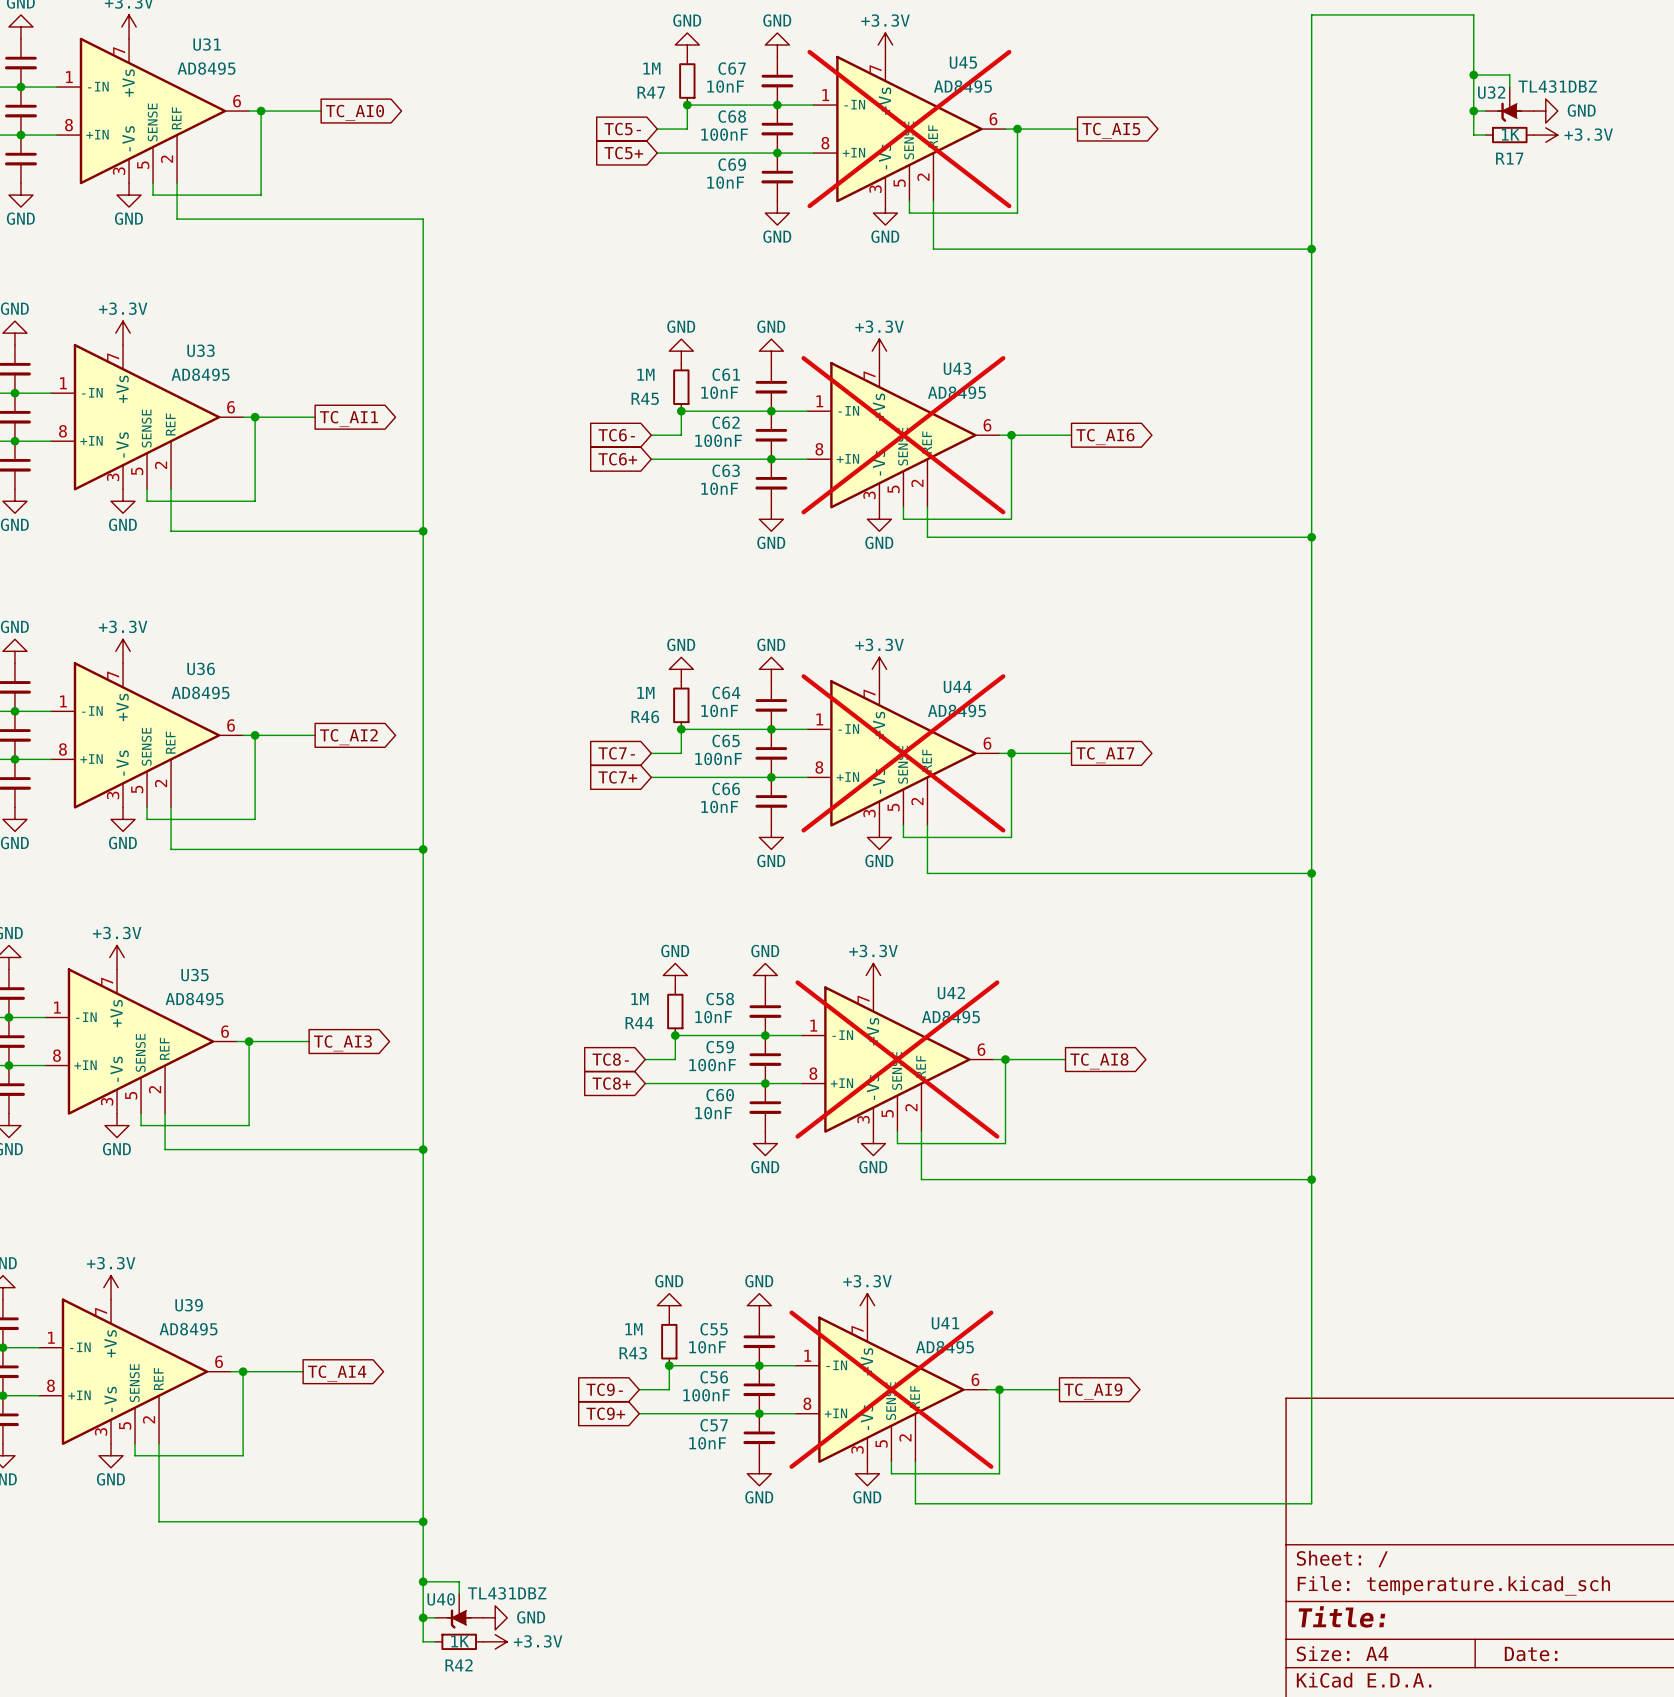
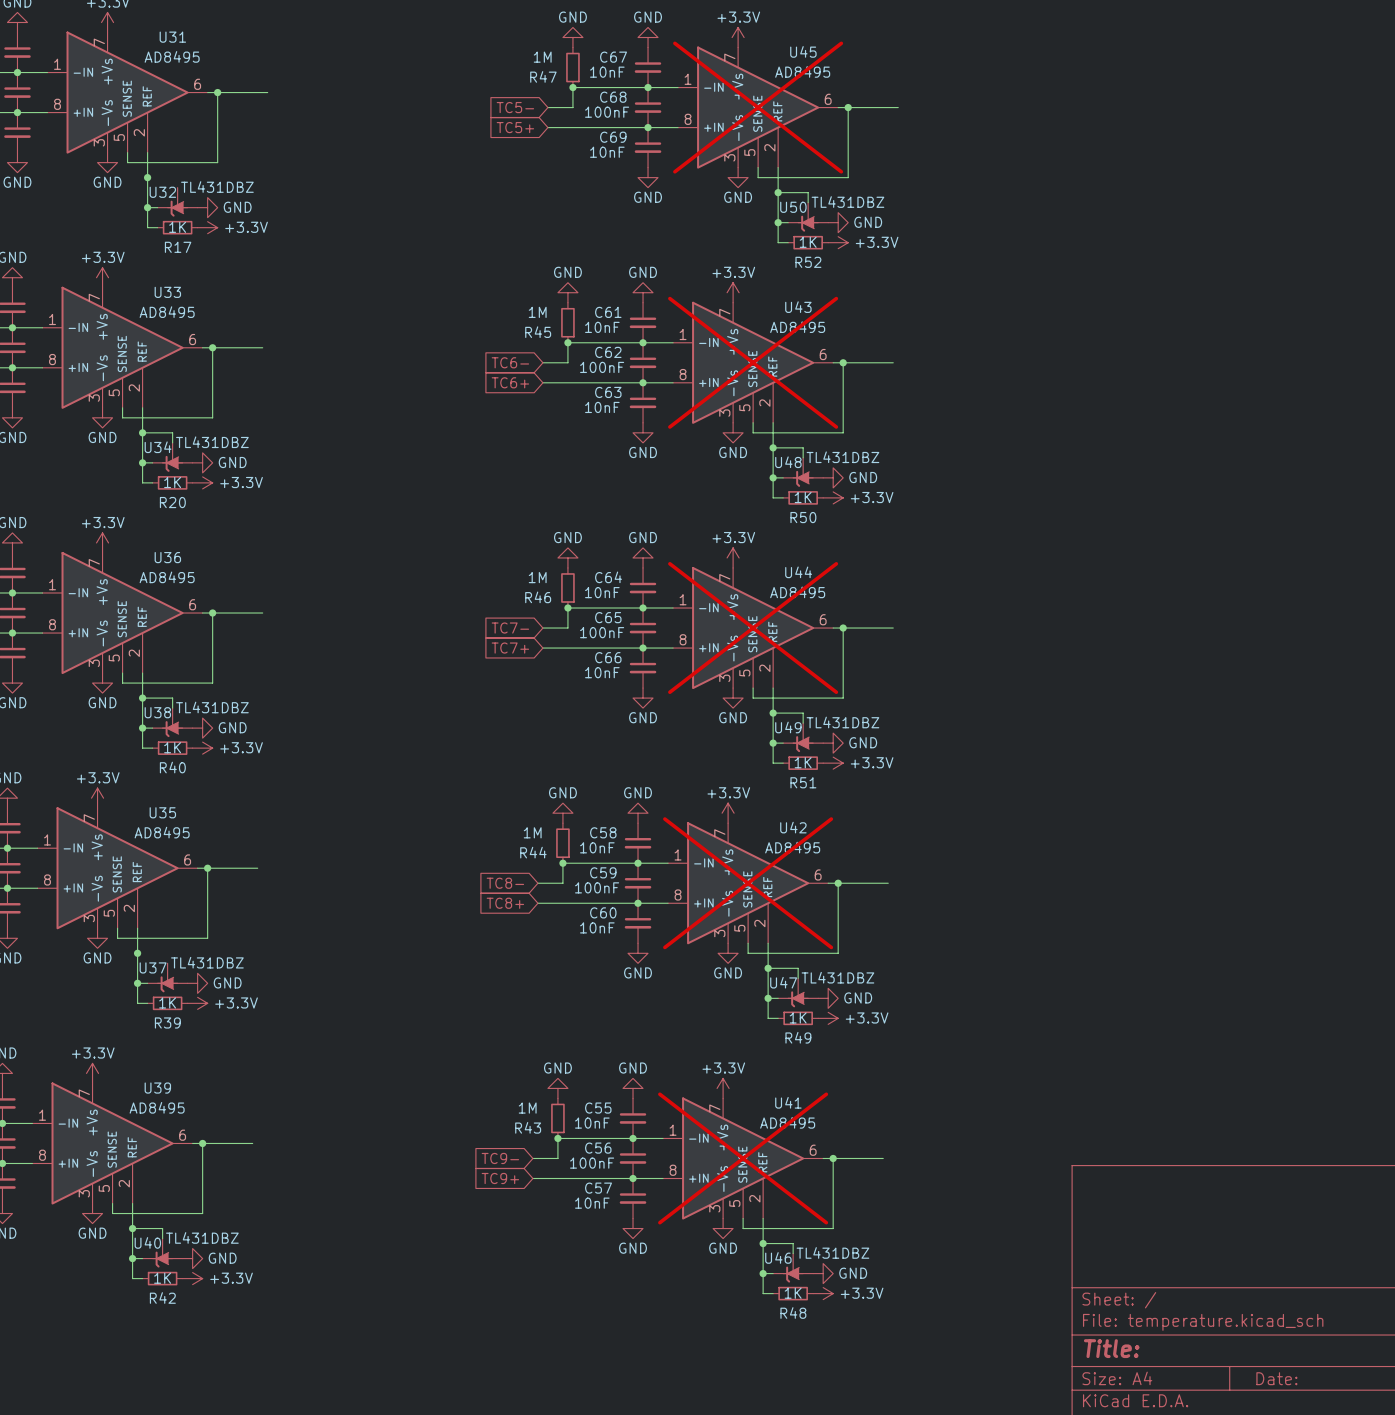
wire: (1473, 75) (1509, 75) (1509, 87) -> none
junction: (1473, 75) -> none
U32 position: (1509, 104) -> (177, 202)
wire: (1473, 111) (1485, 111) -> none
junction: (1473, 111) -> none
power symbol: GND (1545, 111) -> none
global label: TC_AI0 (355, 112) -> none
global label: TC_AI5 (1111, 130) -> none
wire: (1485, 135) (1473, 135) (1473, 14) (1311, 14) (1311, 1503) (915, 1503) -> (773, 1293) (763, 1293) (763, 1253)
R17 position: (1509, 135) -> (177, 227)
power symbol: +3.3V (1545, 135) -> none
junction: none -> (147, 177)
wire: (177, 219) (423, 219) (423, 1641) (435, 1641) -> (147, 182) (147, 227) (157, 227)
wire: none -> (778, 192) (808, 192) (808, 202)
junction: none -> (778, 192)
wire: none -> (147, 207) (157, 207)
junction: none -> (147, 207)
power symbol: none -> GND (207, 207)
wire: (933, 249) (1311, 249) -> (778, 207) (778, 242) (788, 242)
junction: (1311, 249) -> none
U50: none -> TL431DBZ (808, 217)
wire: none -> (778, 222) (788, 222)
junction: none -> (778, 222)
power symbol: none -> GND (838, 222)
power symbol: none -> +3.3V (207, 227)
R52: none -> 1K (808, 242)
power symbol: none -> +3.3V (838, 242)
global label: TC_AI1 (348, 419) -> none
global label: TC_AI6 (1105, 437) -> none
wire: none -> (142, 432) (172, 432) (172, 442)
junction: none -> (142, 432)
wire: (171, 531) (423, 531) -> (142, 442) (142, 482) (152, 482)
junction: (423, 531) -> none
wire: none -> (773, 447) (773, 497) (783, 497)
junction: none -> (773, 447)
wire: (963, 537) (1311, 537) -> (803, 447) (803, 457)
junction: (1311, 537) -> none
U34: none -> TL431DBZ (172, 457)
wire: none -> (142, 462) (152, 462)
junction: none -> (142, 462)
power symbol: none -> GND (202, 462)
U48: none -> TL431DBZ (803, 472)
wire: none -> (773, 477) (783, 477)
junction: none -> (773, 477)
power symbol: none -> GND (833, 477)
R20: none -> 1K (172, 482)
power symbol: none -> +3.3V (202, 482)
R50: none -> 1K (803, 497)
power symbol: none -> +3.3V (833, 497)
global label: TC_AI2 (348, 737) -> none
global label: TC_AI7 (1105, 755) -> none
wire: none -> (142, 698) (172, 698) (172, 708)
junction: none -> (142, 698)
wire: (171, 849) (423, 849) -> (142, 708) (142, 748) (152, 748)
junction: (423, 849) -> none
wire: none -> (773, 713) (803, 713) (803, 723)
junction: none -> (773, 713)
U38: none -> TL431DBZ (172, 722)
wire: none -> (142, 728) (152, 728)
junction: none -> (142, 728)
power symbol: none -> GND (202, 728)
wire: (927, 873) (1311, 873) -> (773, 728) (773, 763) (783, 763)
junction: (1311, 873) -> none
U49: none -> TL431DBZ (803, 737)
wire: none -> (773, 743) (783, 743)
junction: none -> (773, 743)
power symbol: none -> GND (833, 743)
R40: none -> 1K (172, 748)
power symbol: none -> +3.3V (202, 748)
R51: none -> 1K (803, 763)
power symbol: none -> +3.3V (833, 763)
global label: TC_AI3 (342, 1043) -> none
global label: TC_AI8 (1099, 1061) -> none
junction: none -> (137, 953)
wire: (165, 1149) (423, 1149) -> (137, 958) (137, 1003) (147, 1003)
junction: (423, 1149) -> none
wire: none -> (768, 968) (798, 968) (798, 978)
junction: none -> (768, 968)
U37: none -> TL431DBZ (167, 977)
wire: none -> (137, 983) (147, 983)
junction: none -> (137, 983)
power symbol: none -> GND (197, 983)
wire: (921, 1179) (1311, 1179) -> (768, 983) (768, 1018) (778, 1018)
junction: (1311, 1179) -> none
U47: none -> TL431DBZ (798, 992)
wire: none -> (768, 998) (778, 998)
junction: none -> (768, 998)
power symbol: none -> GND (828, 998)
R39: none -> 1K (167, 1003)
power symbol: none -> +3.3V (197, 1003)
R49: none -> 1K (798, 1018)
power symbol: none -> +3.3V (828, 1018)
global label: TC_AI4 (337, 1373) -> none
global label: TC_AI9 (1093, 1391) -> none
wire: none -> (132, 1228) (162, 1228) (162, 1238)
junction: none -> (132, 1228)
wire: none -> (763, 1243) (793, 1243) (793, 1253)
junction: none -> (763, 1243)
wire: none -> (132, 1258) (142, 1258)
junction: none -> (132, 1258)
power symbol: none -> GND (192, 1258)
wire: (159, 1521) (423, 1521) -> (132, 1268) (132, 1278) (142, 1278)
junction: (423, 1521) -> none
U46: none -> TL431DBZ (793, 1268)
wire: none -> (763, 1273) (773, 1273)
junction: none -> (763, 1273)
power symbol: none -> GND (823, 1273)
power symbol: none -> +3.3V (192, 1278)
R48: none -> 1K (793, 1293)
power symbol: none -> +3.3V (823, 1293)
wire: (423, 1581) (459, 1581) (459, 1593) -> none
junction: (423, 1581) -> none
U40 position: (459, 1611) -> (162, 1253)
wire: (423, 1617) (435, 1617) -> none
junction: (423, 1617) -> none
power symbol: GND (495, 1617) -> none
R42 position: (459, 1641) -> (162, 1278)
power symbol: +3.3V (495, 1641) -> none

